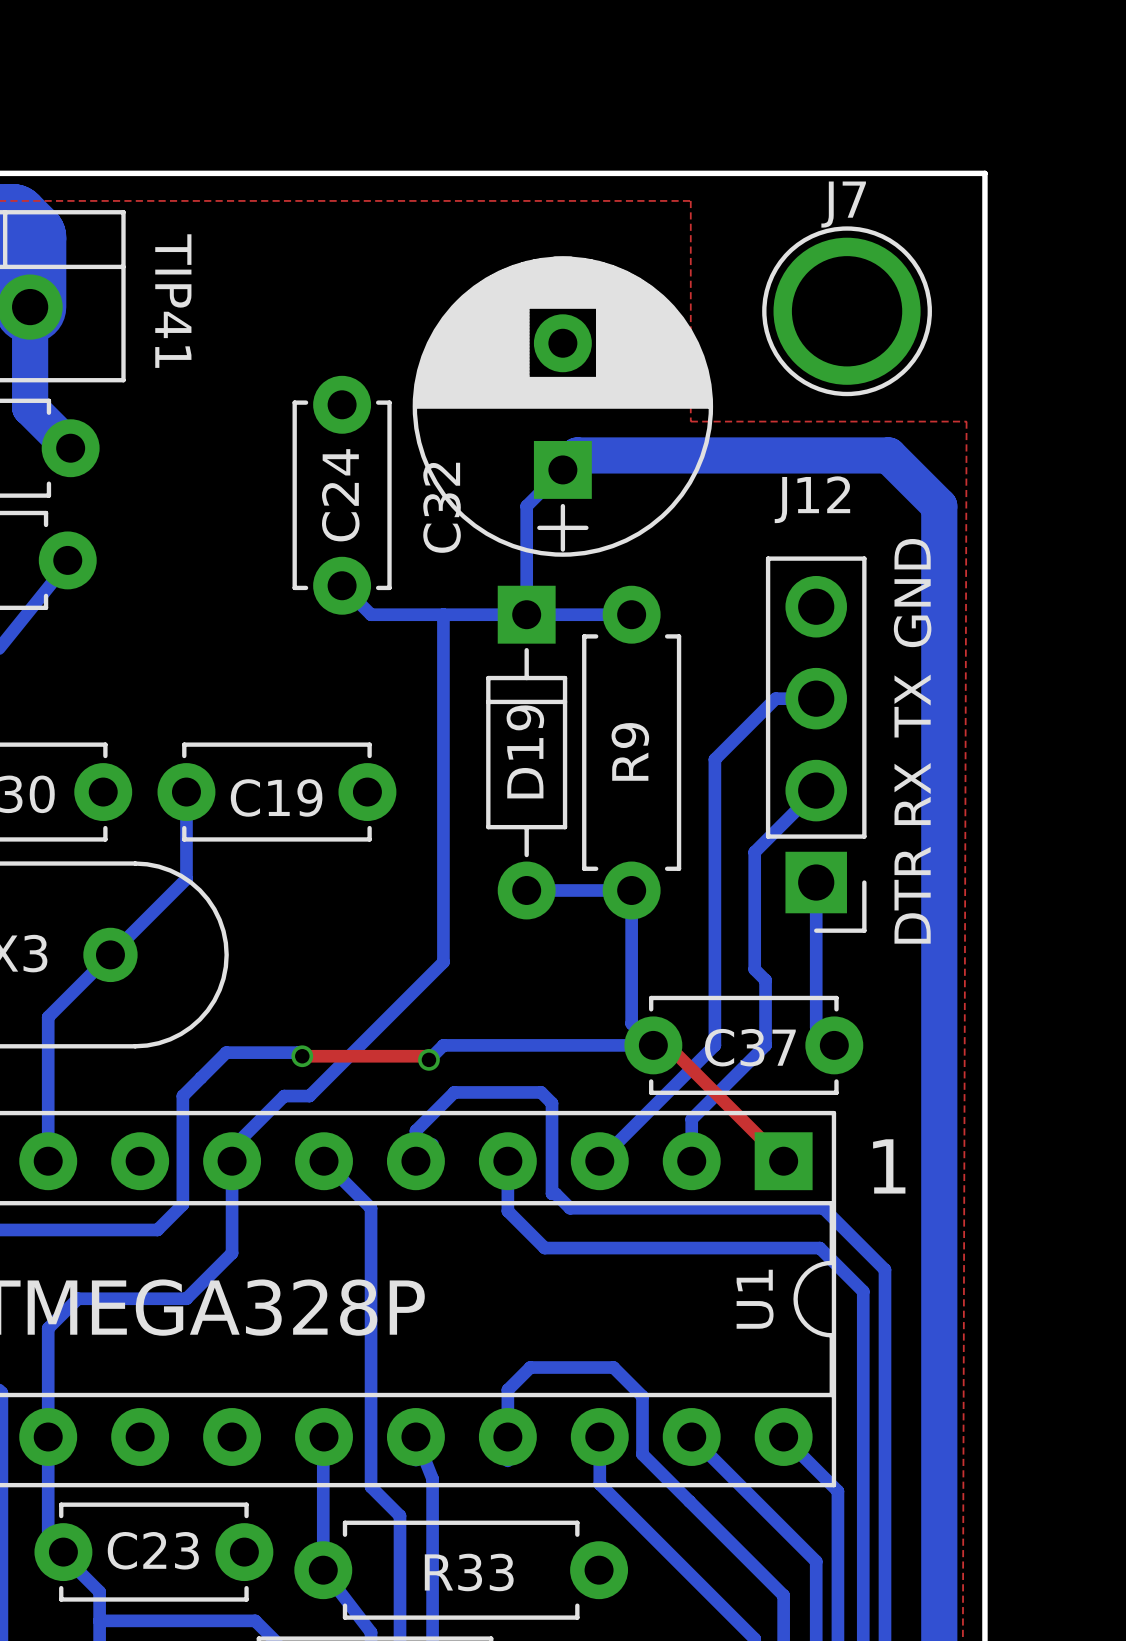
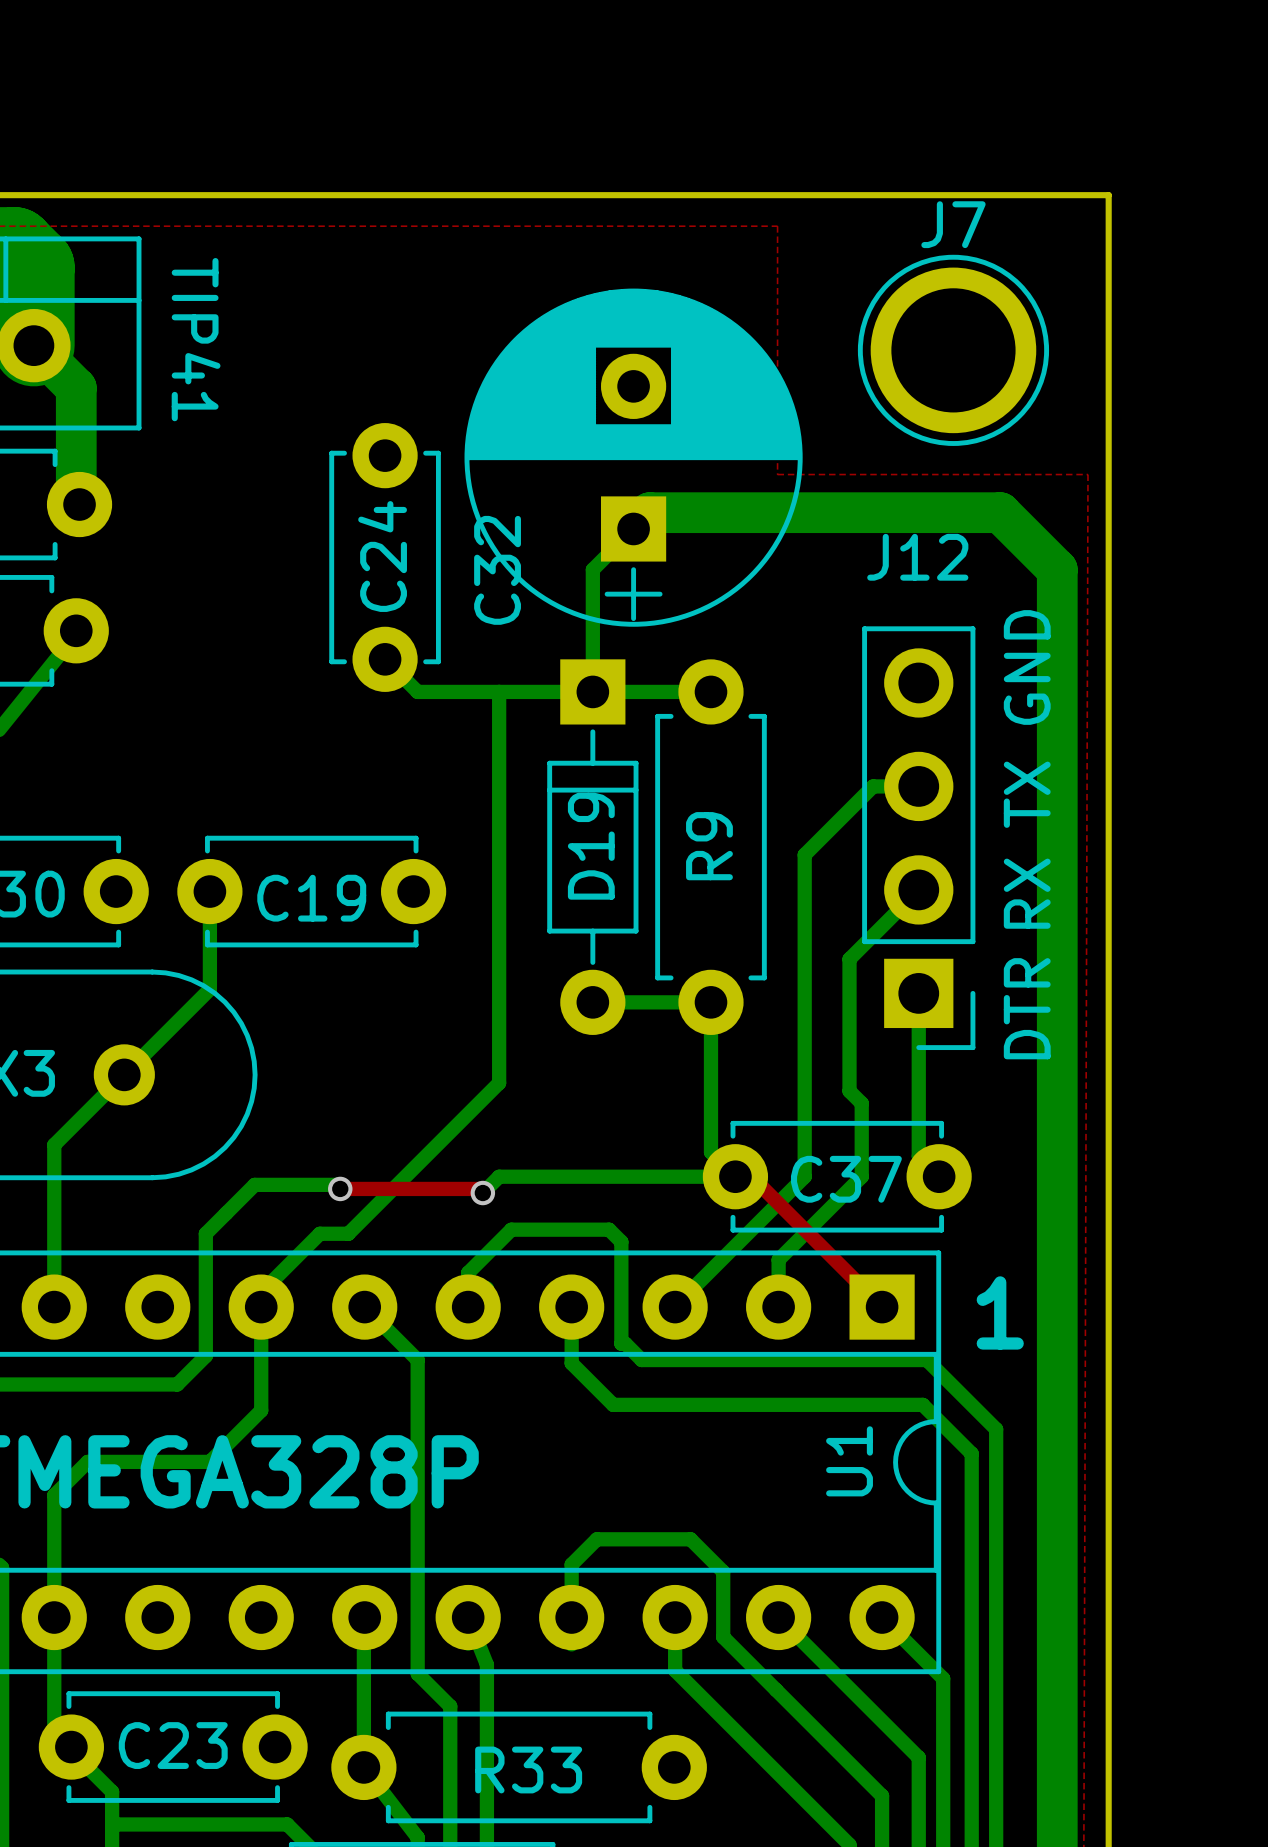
bottom track: (30, 307) (30, 407) (70, 448) -> (33, 345) (76, 388) (76, 508)

